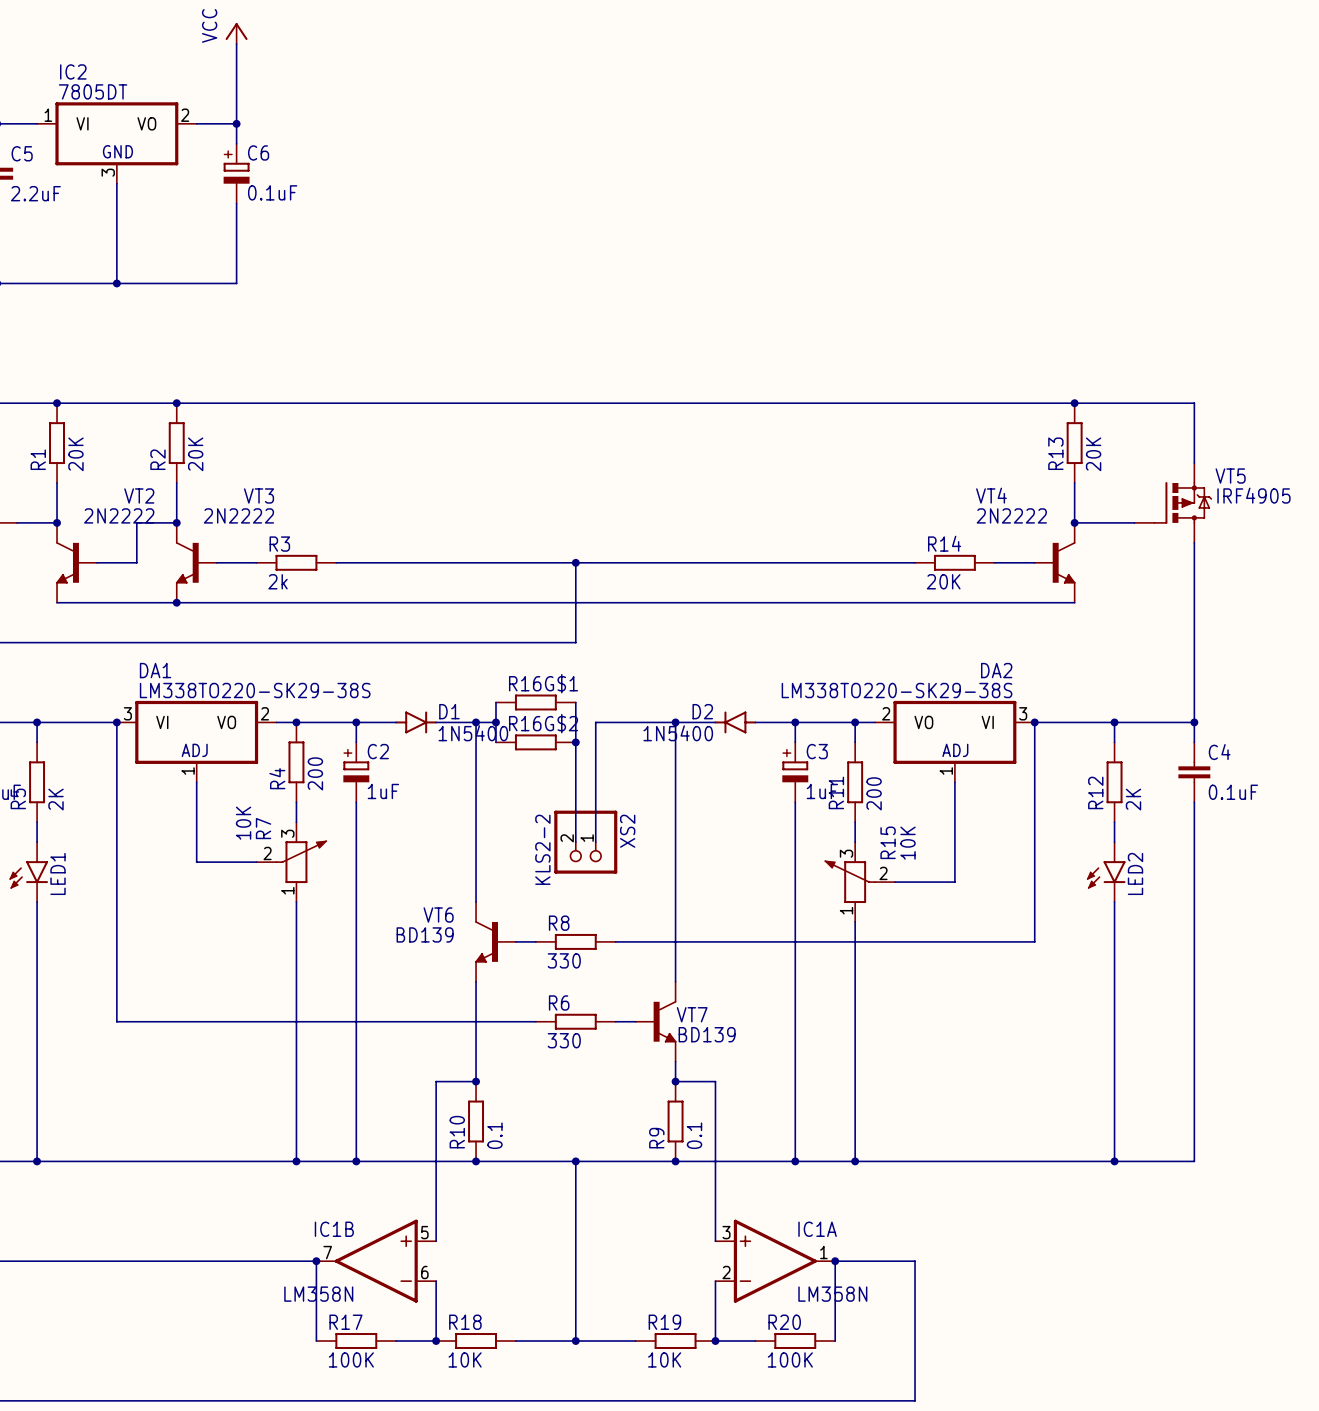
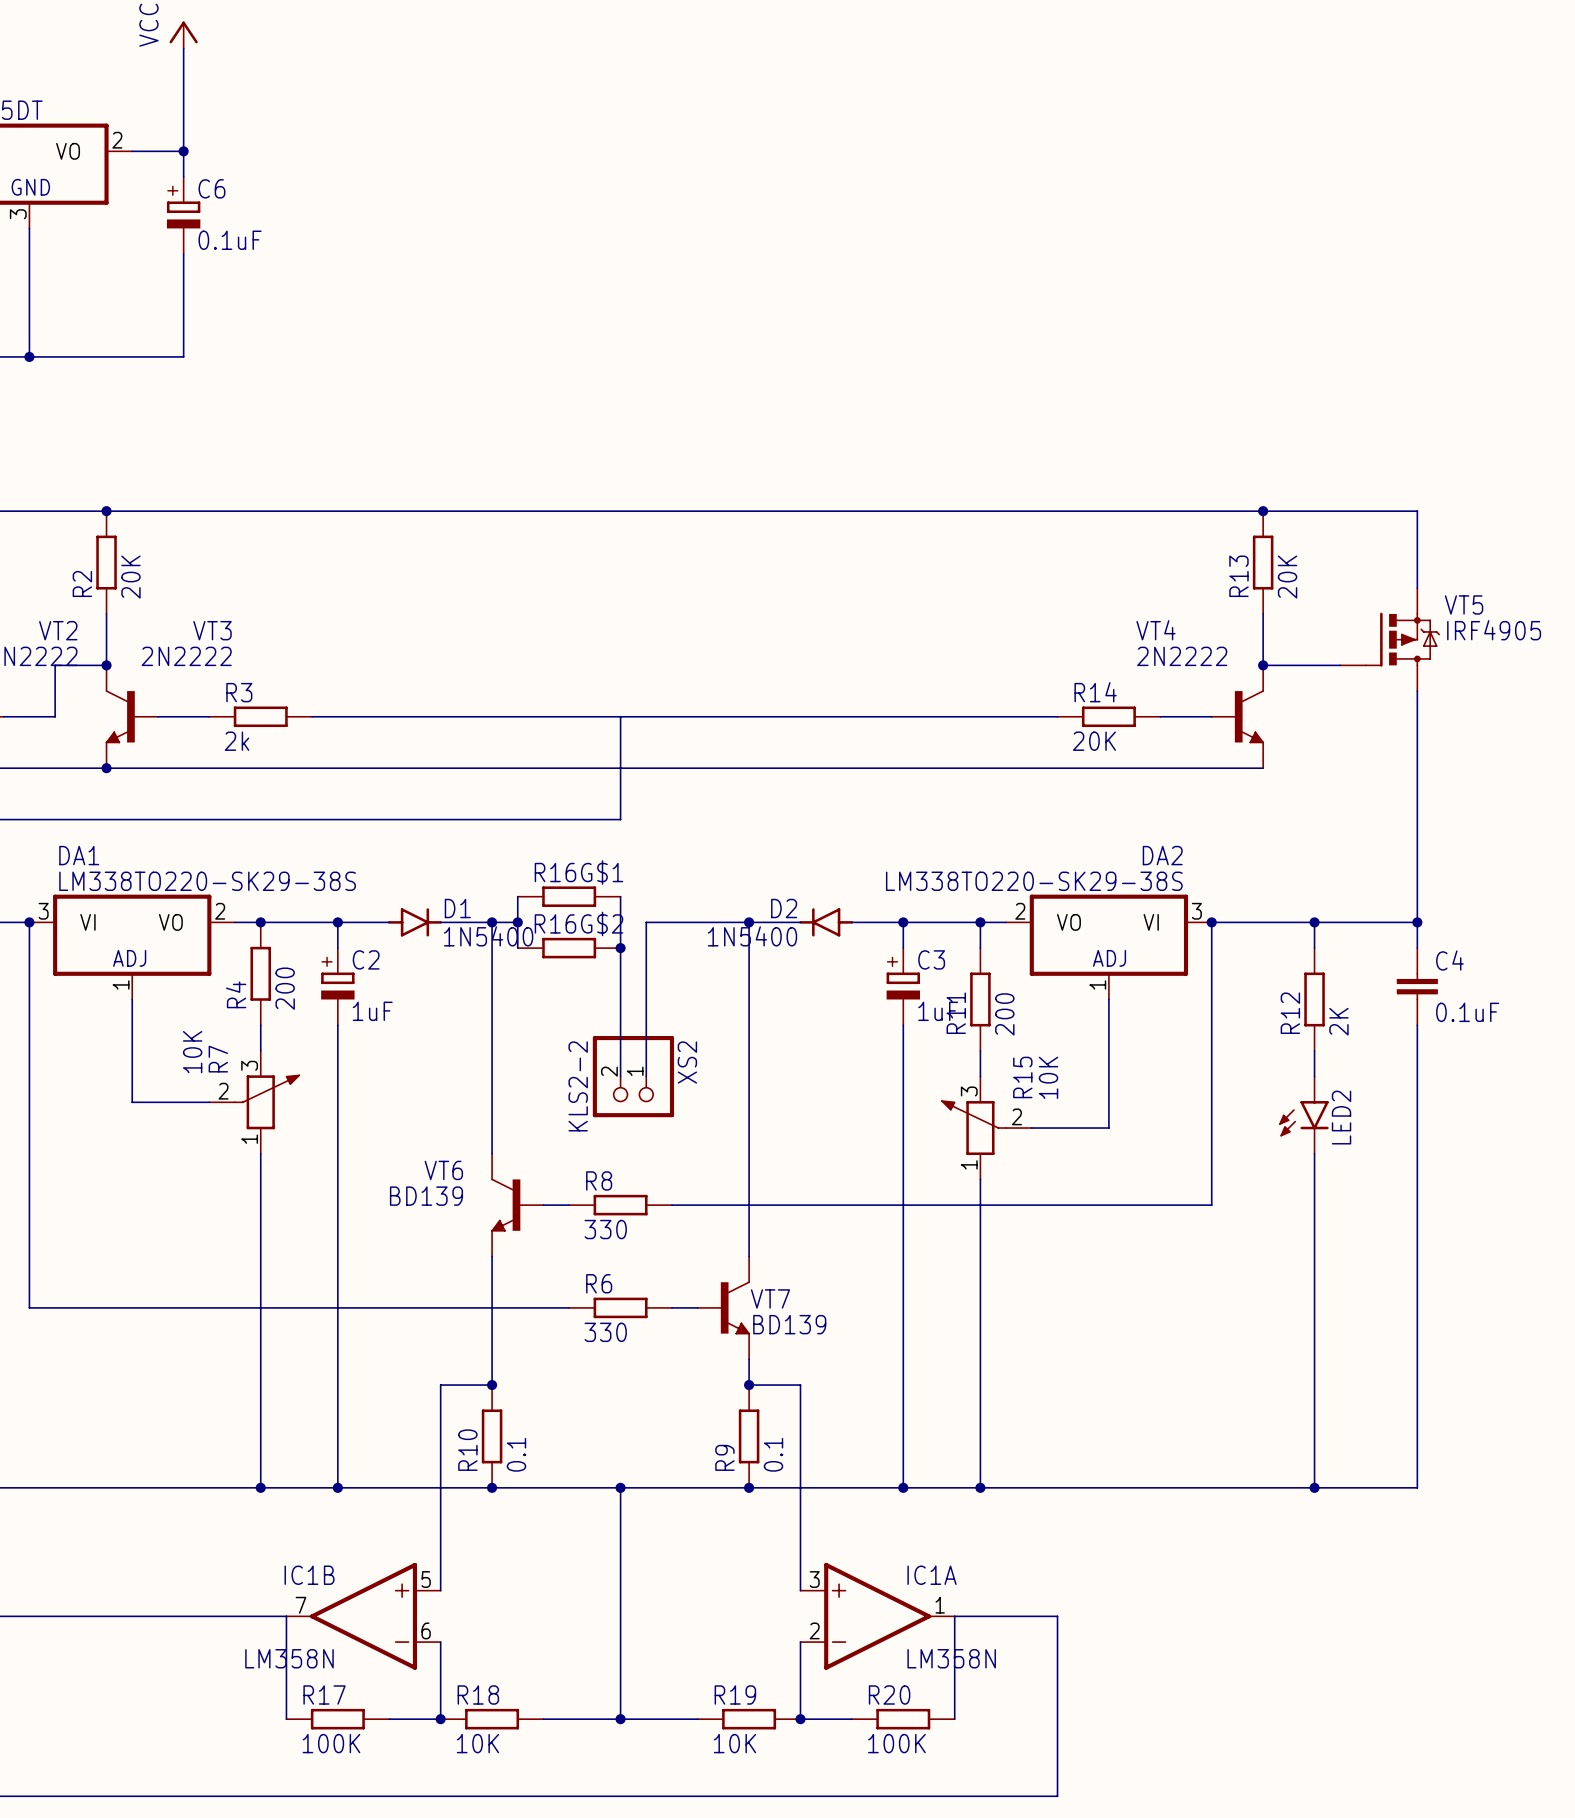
junction: (575, 562) -> none
junction: (316, 1261) -> none
junction: (835, 1261) -> none

